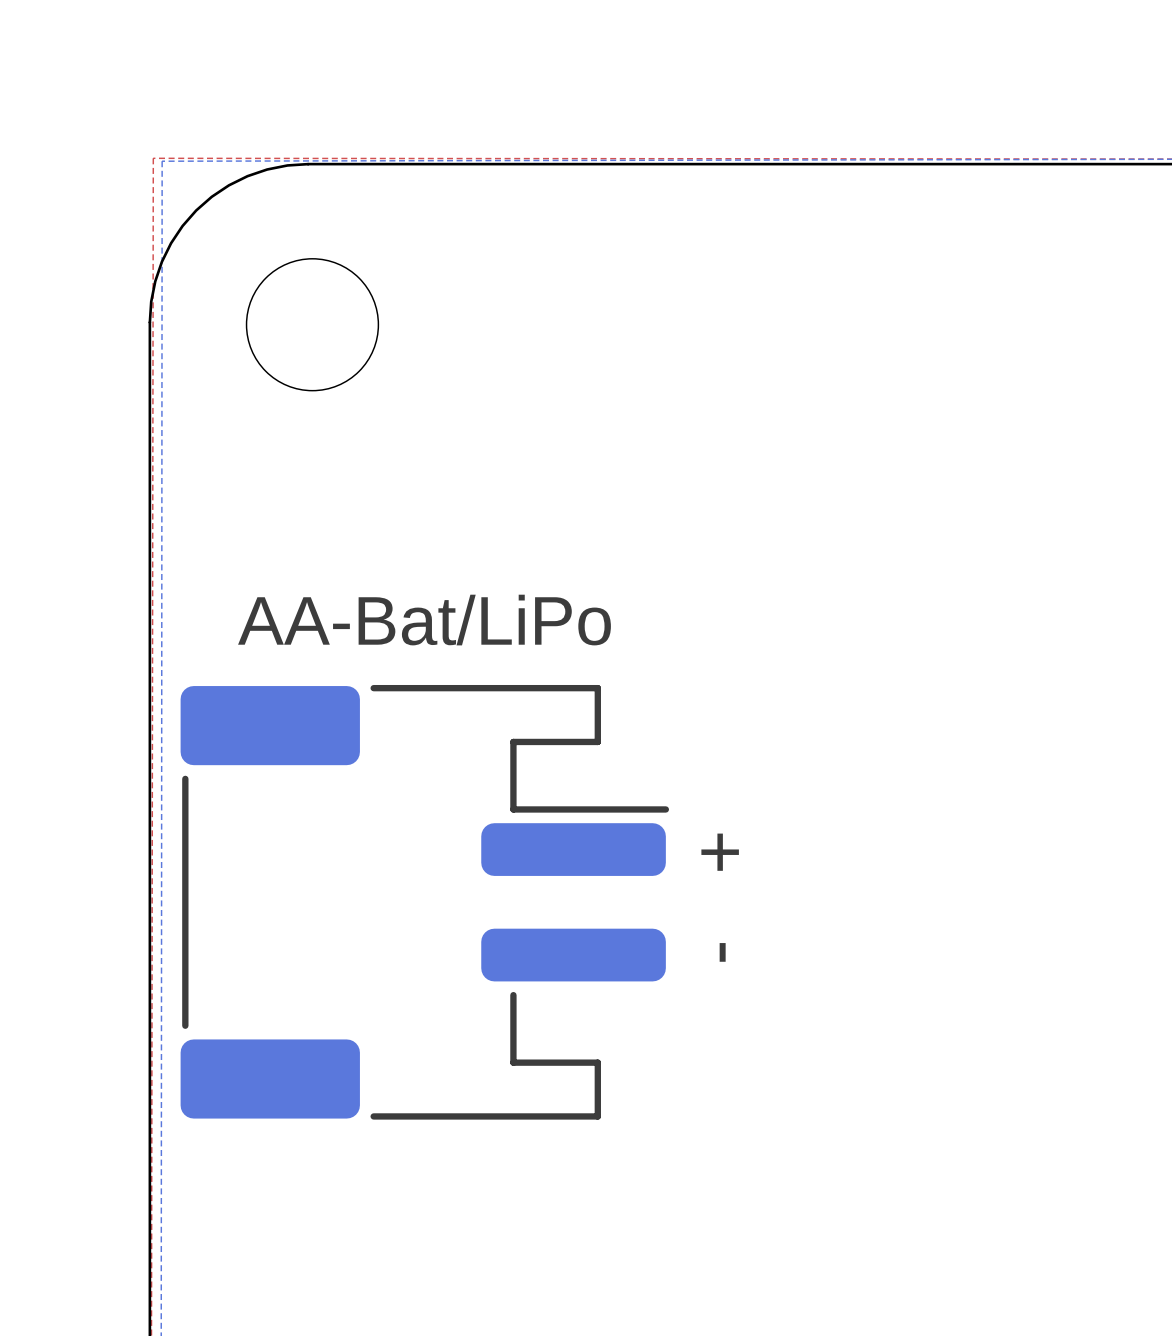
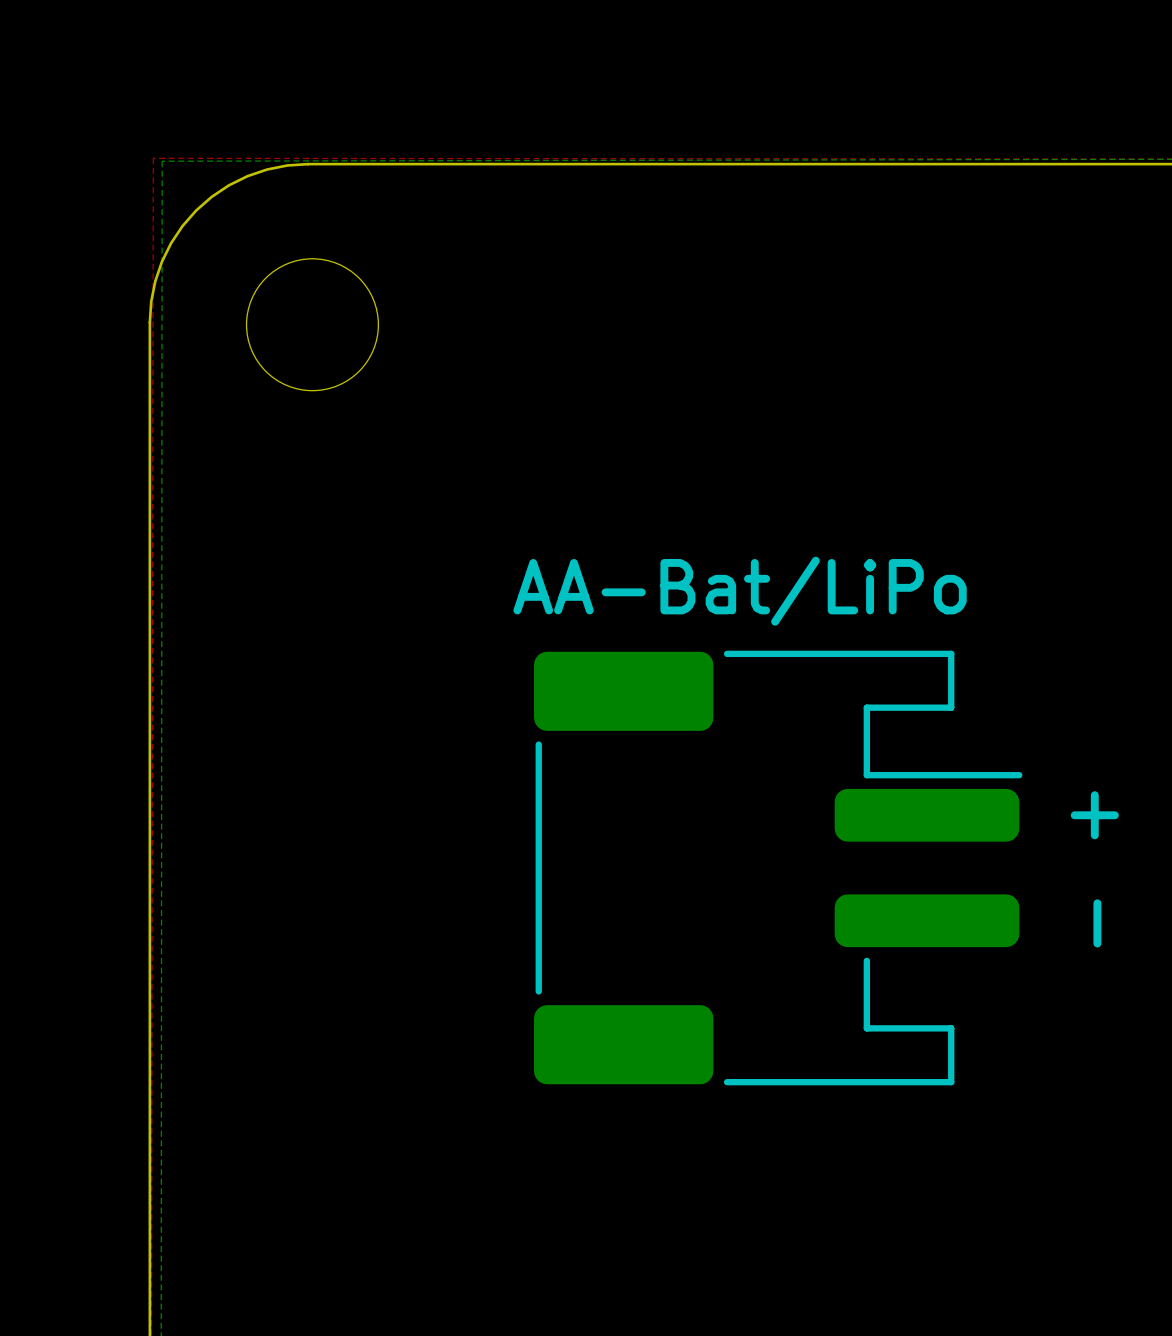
text position: AA-Bat/LiPo (424, 620) -> AA-Bat/LiPo (740, 591)
text position: + (720, 852) -> + (1094, 815)
part position: (424, 902) -> (778, 868)
text position: - (722, 952) -> - (1097, 923)

